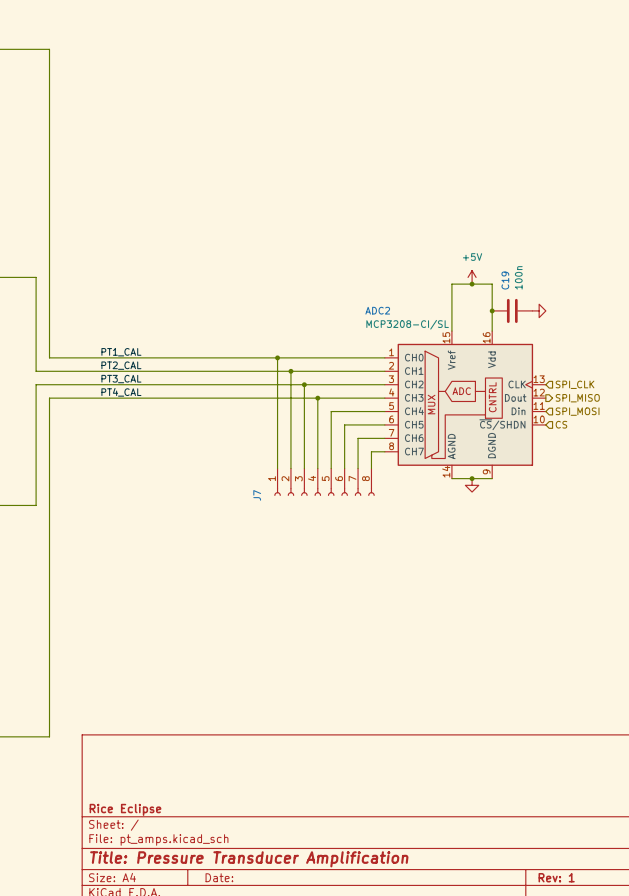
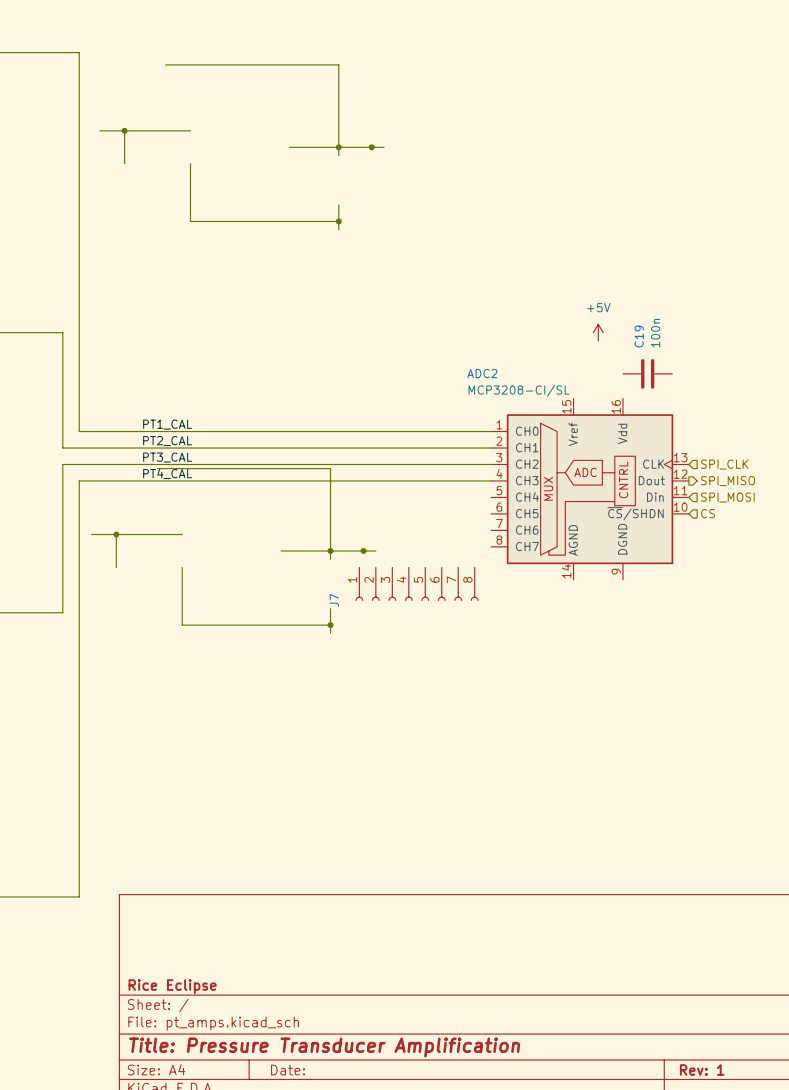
wire: none -> (165, 64) (338, 64) (338, 155)
wire: none -> (99, 130) (190, 130)
wire: none -> (124, 130) (124, 163)
junction: none -> (124, 130)
wire: none -> (289, 147) (384, 147)
junction: none -> (338, 147)
junction: none -> (371, 147)
wire: none -> (190, 163) (190, 221) (338, 221)
wire: none -> (338, 204) (338, 229)
junction: none -> (338, 221)
junction: (472, 284) -> none
junction: (492, 310) -> none
power symbol: (539, 310) -> none
wire: (451, 331) (451, 284) (492, 284) (492, 331) -> none
wire: (277, 357) (277, 468) -> none
junction: (277, 357) -> none
wire: (290, 371) (290, 468) -> none
junction: (290, 371) -> none
wire: (304, 384) (304, 468) -> none
junction: (304, 384) -> none
wire: none -> (157, 468) (330, 468) (330, 559)
wire: (317, 398) (317, 468) -> none
junction: (317, 398) -> none
wire: (384, 411) (331, 411) (331, 468) -> none
wire: (384, 424) (344, 424) (344, 468) -> none
wire: (384, 438) (358, 438) (358, 468) -> none
wire: none -> (91, 534) (182, 534)
wire: none -> (116, 534) (116, 567)
junction: none -> (116, 534)
wire: (384, 451) (371, 451) (371, 468) -> none
wire: none -> (281, 550) (375, 550)
junction: none -> (330, 550)
junction: none -> (363, 550)
wire: none -> (182, 567) (182, 625) (330, 625)
wire: (451, 478) (492, 478) -> none
junction: (472, 478) -> none
power symbol: (472, 485) -> none
wire: none -> (330, 608) (330, 633)
junction: none -> (330, 625)

